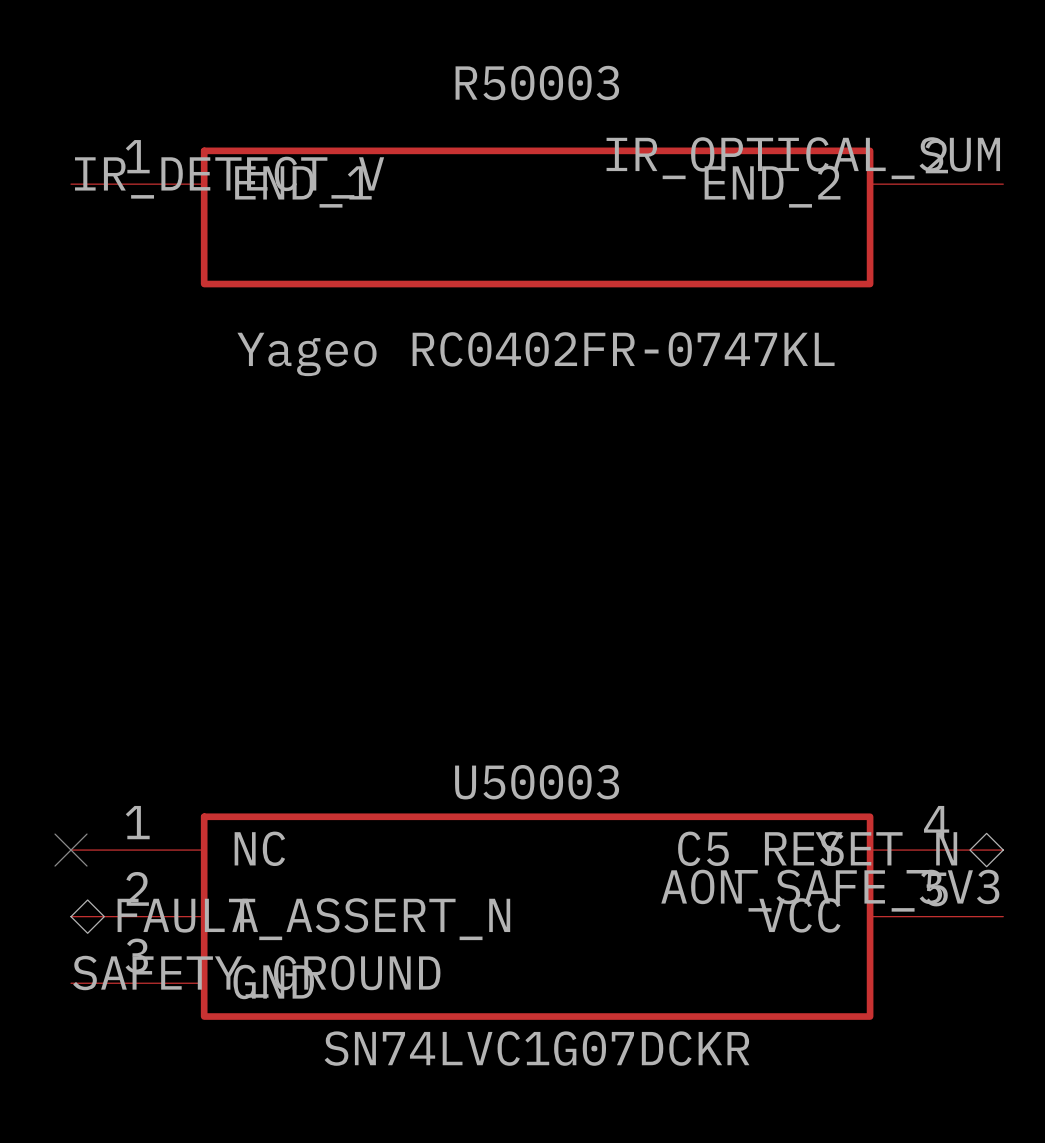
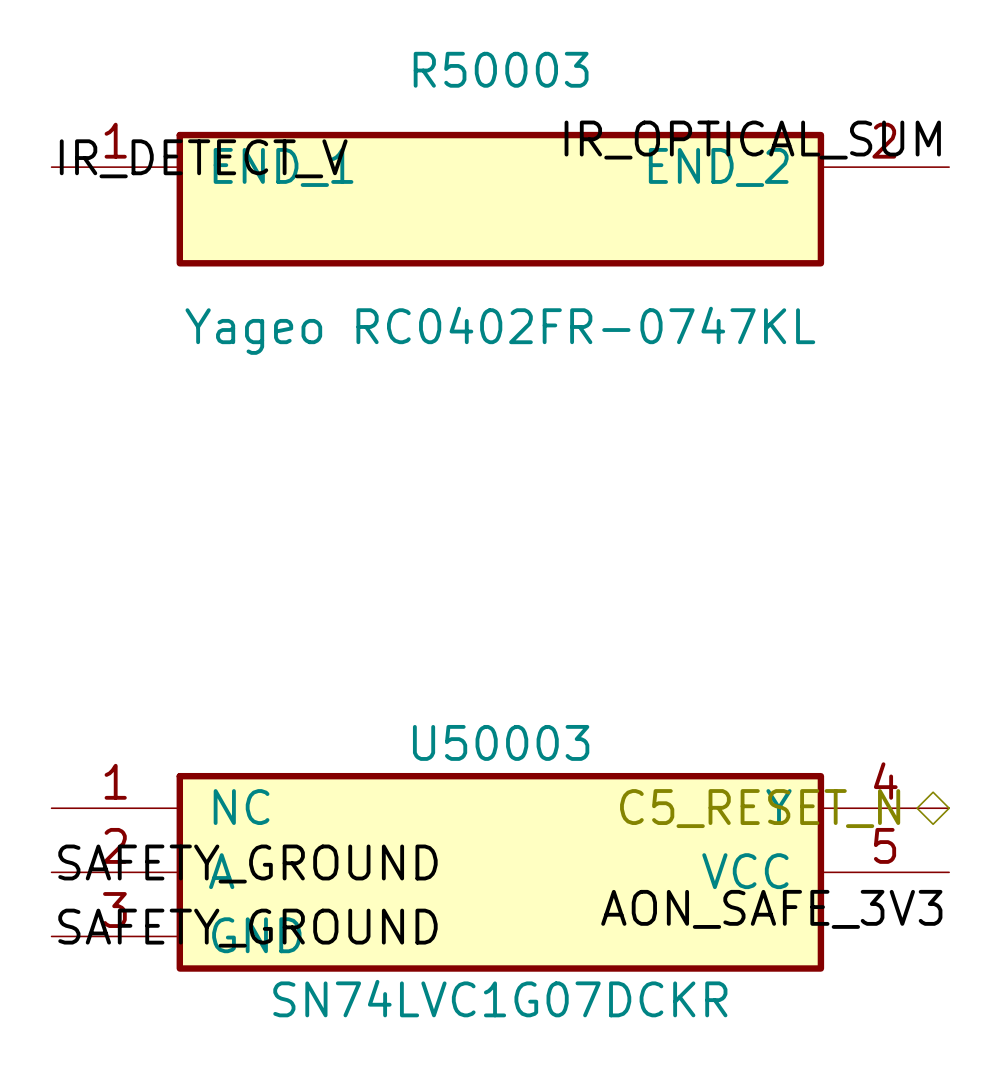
no-connect mark: (71, 850) -> none
label position: AON_SAFE_3V3 (830, 890) -> AON_SAFE_3V3 (771, 909)
label: none -> SAFETY_GROUND (247, 864)
hierarchical label: FAULT_ASSERT_N (313, 919) -> none

